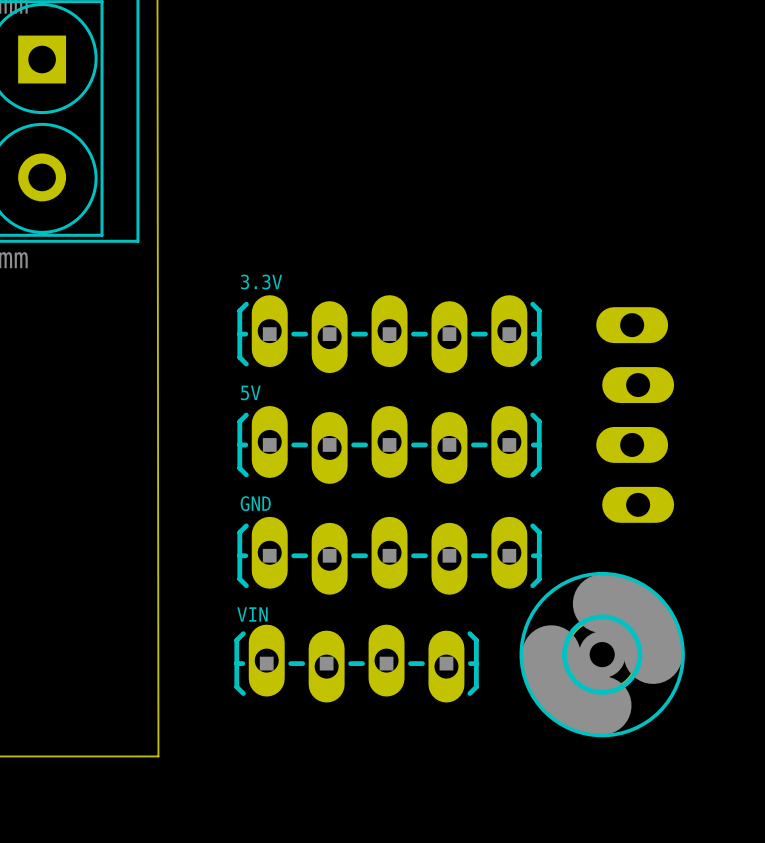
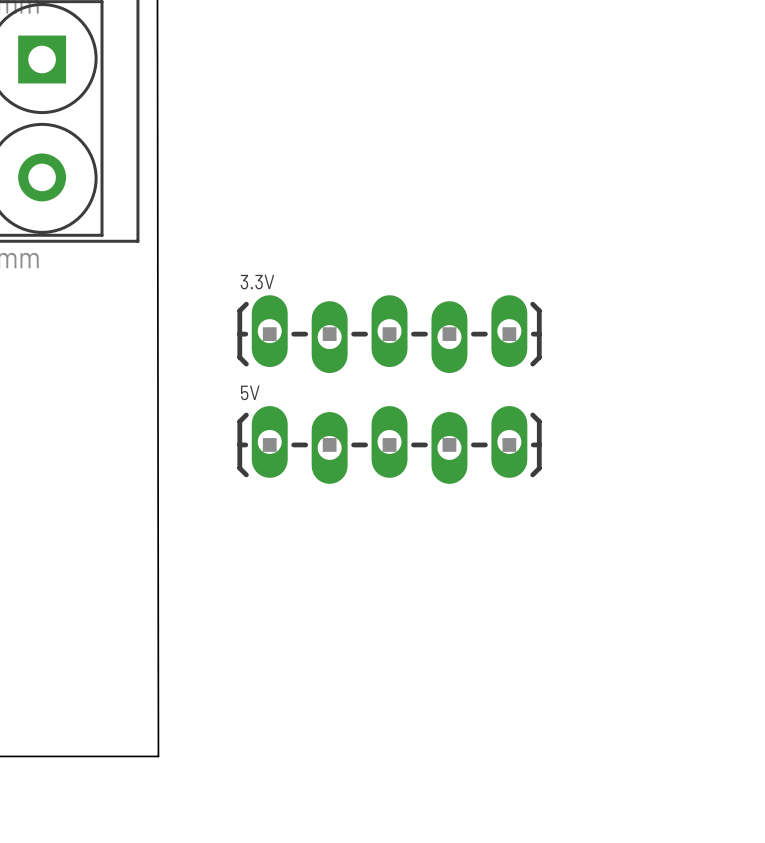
part: (635, 414) -> none
GND: (389, 555) -> none
part: (602, 654) -> none
VIN: (356, 663) -> none

